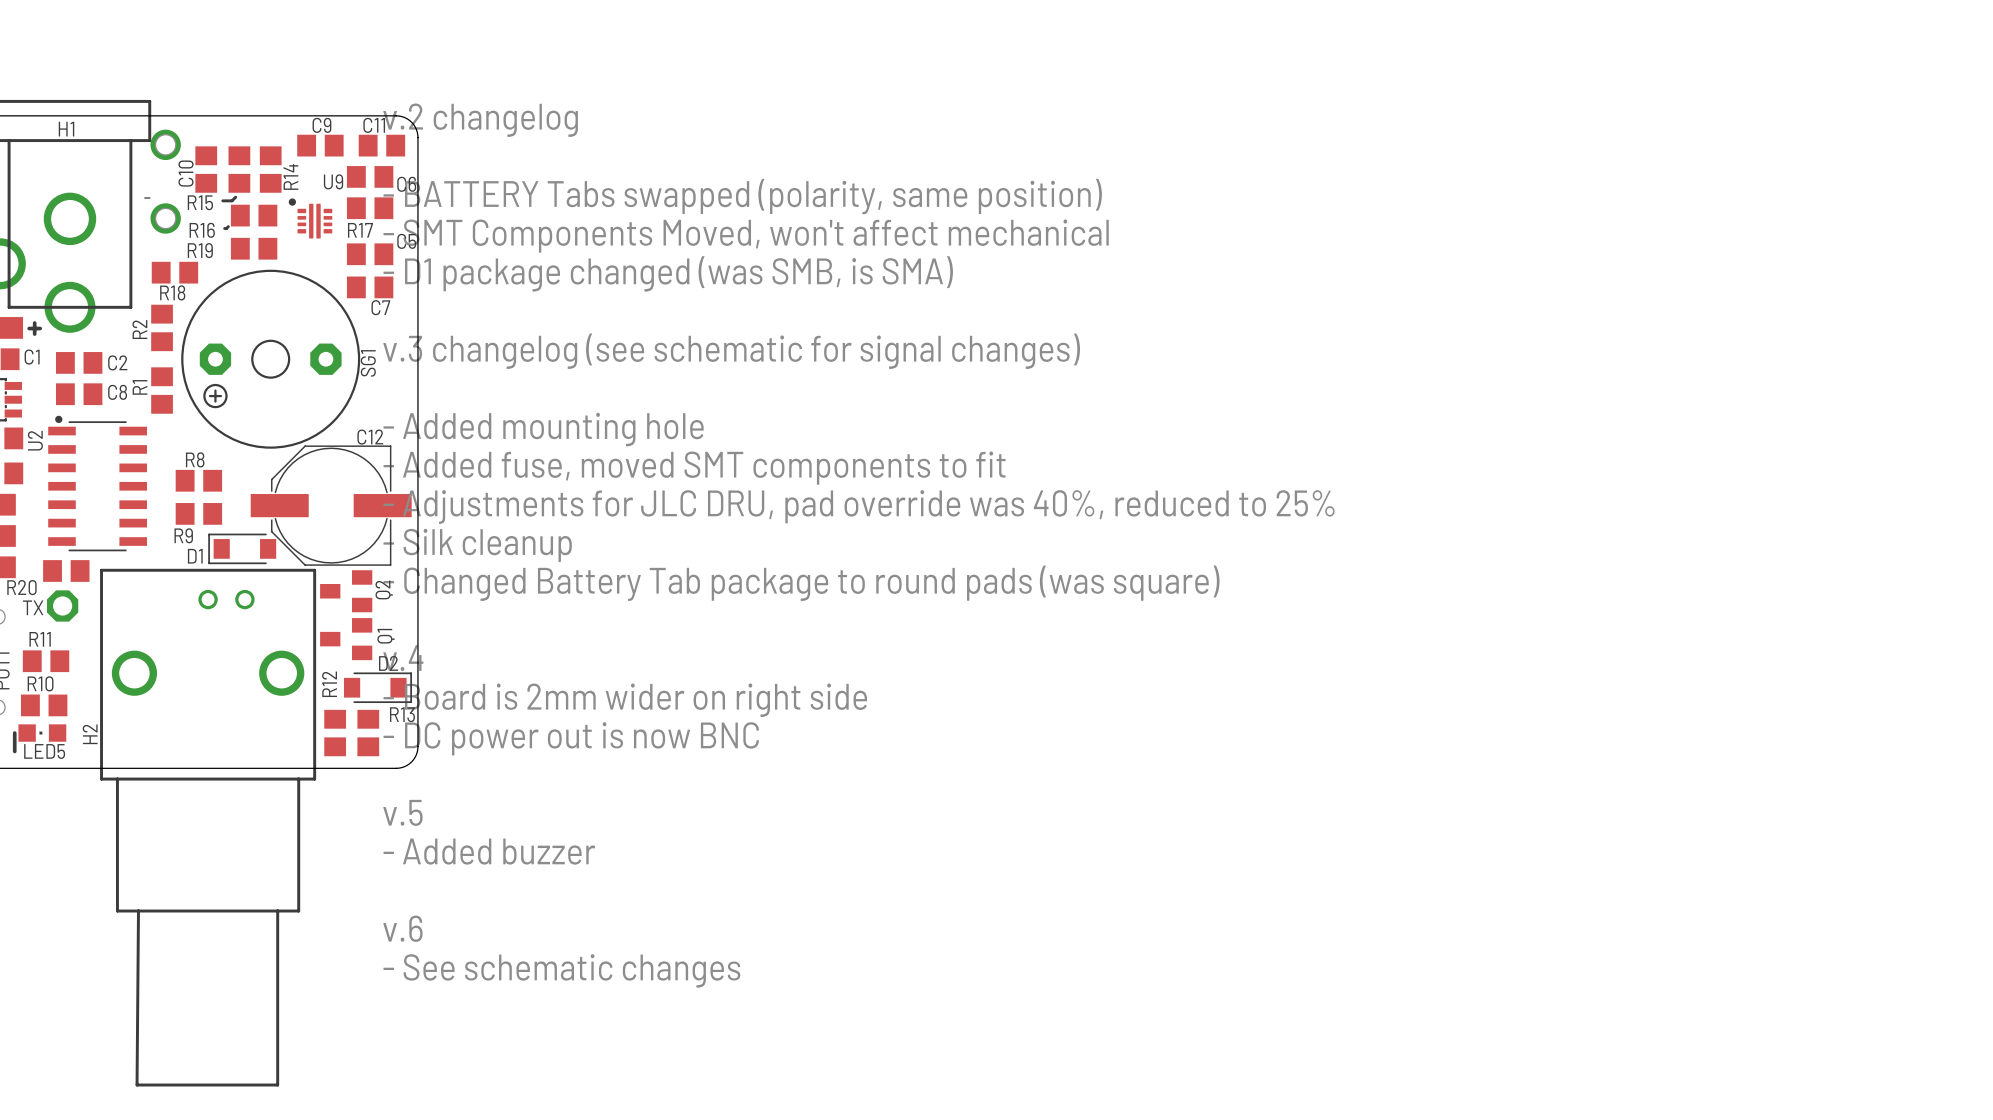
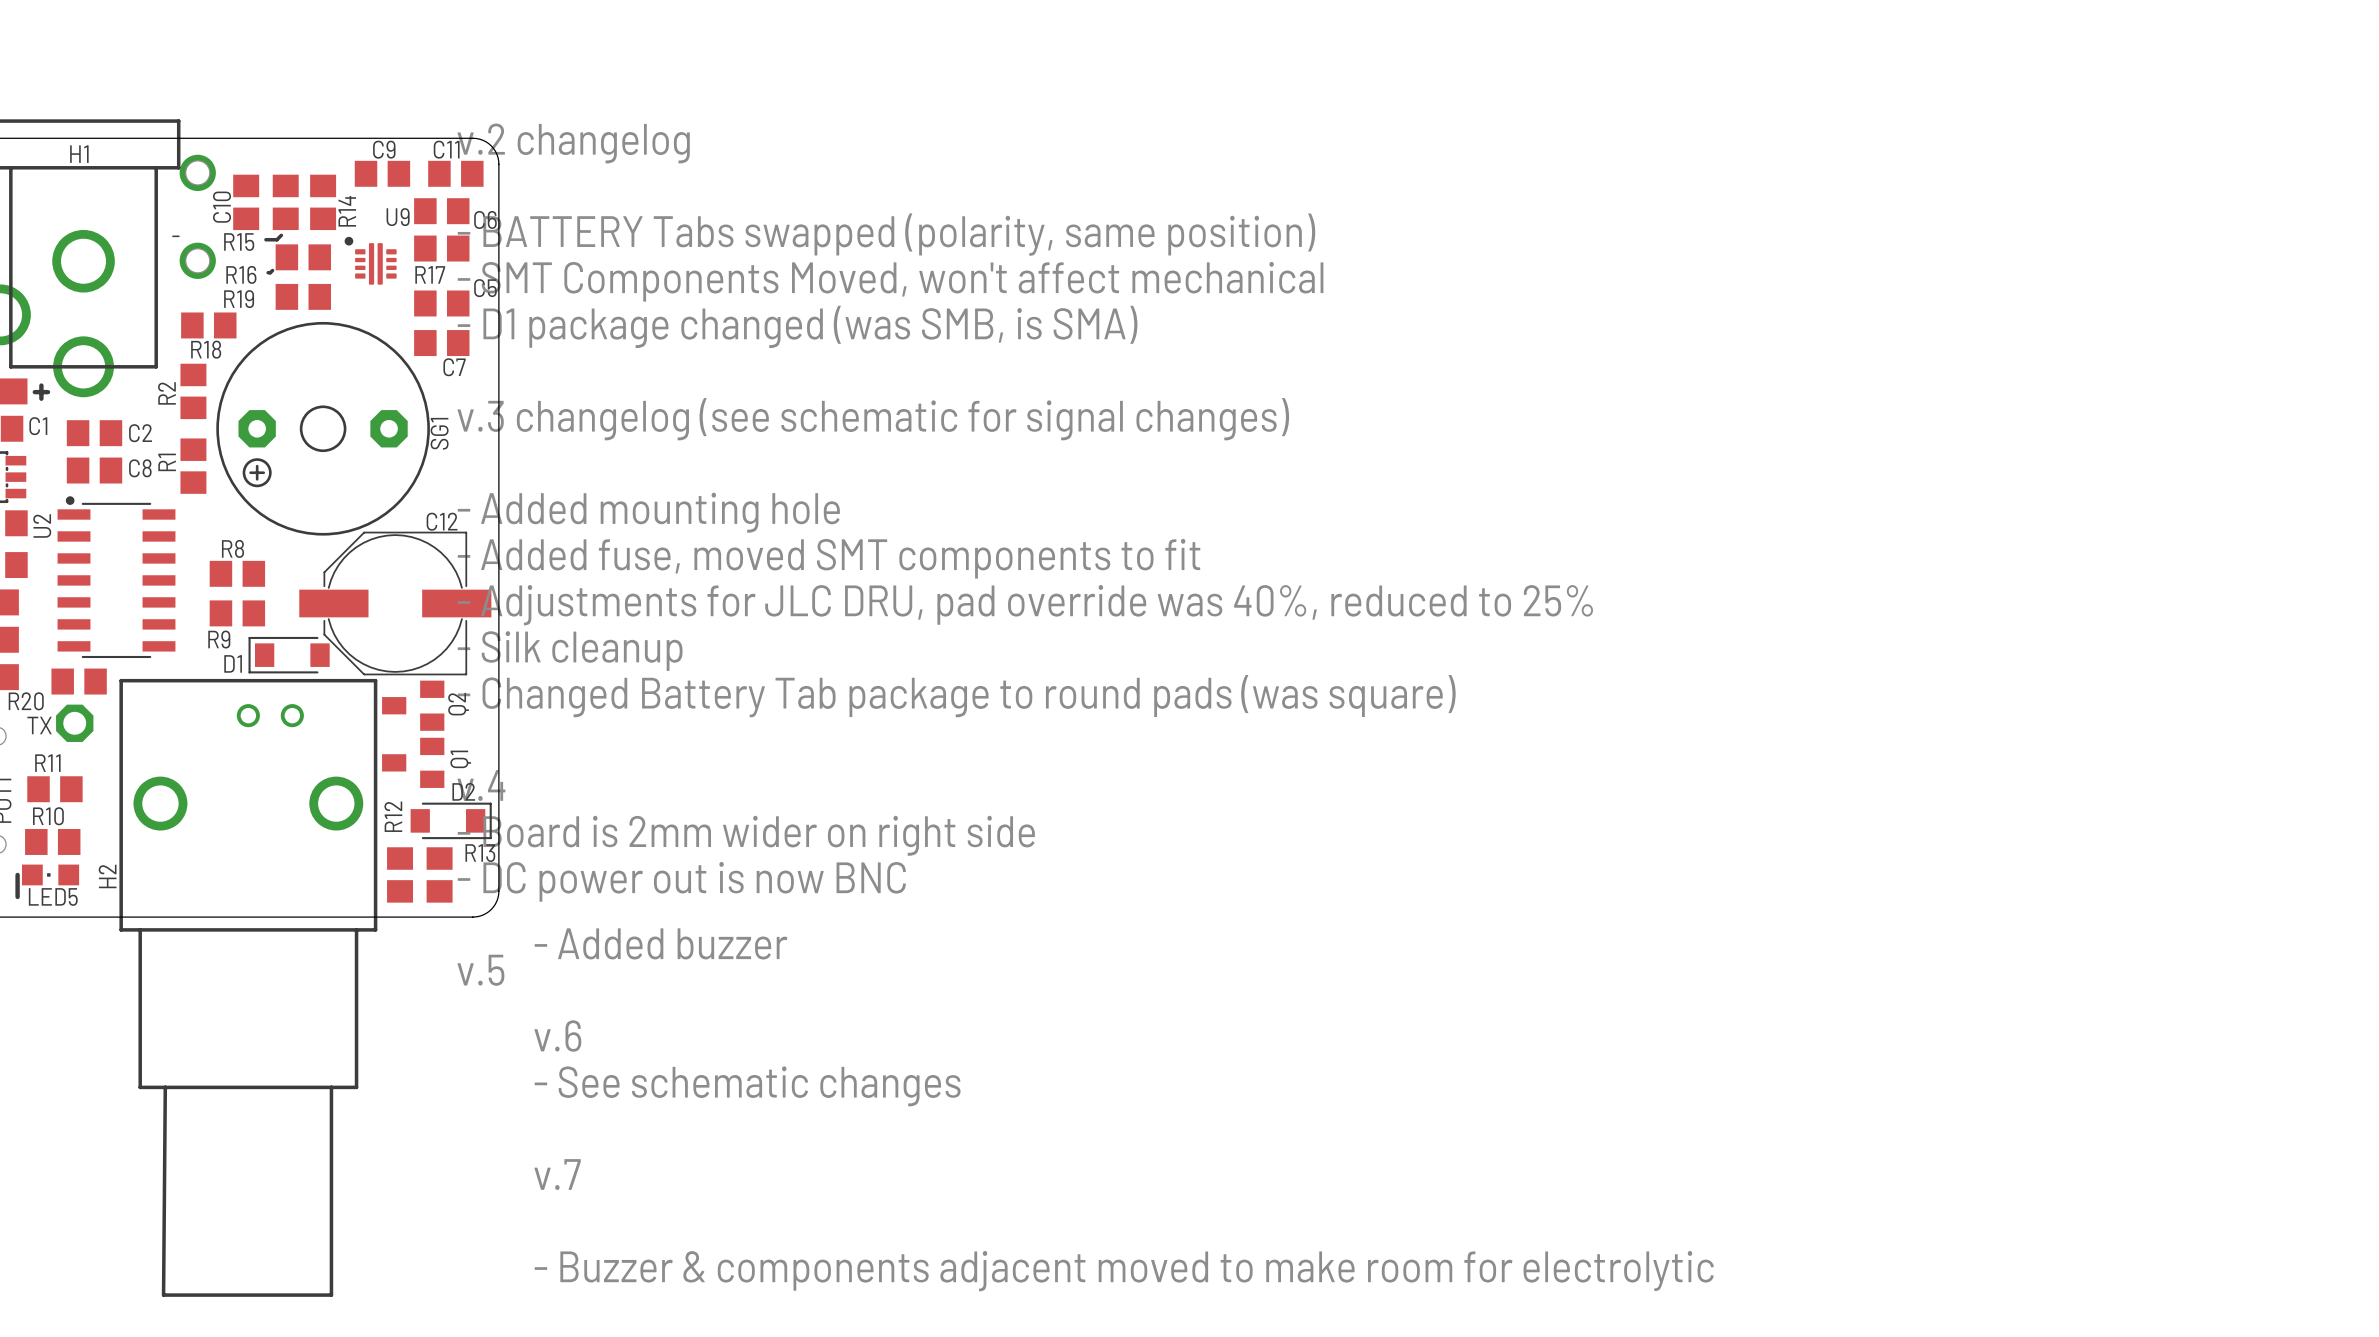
text position: - Added buzzer (489, 851) -> - Added buzzer (661, 943)
text position: v.6 (402, 928) -> v.6 (557, 1036)
text position: - See schematic changes (561, 970) -> - See schematic changes (747, 1086)
text: none -> v.7 (557, 1174)
text: none -> - Buzzer & components adjacent moved to make room for electrolytic (1124, 1271)

